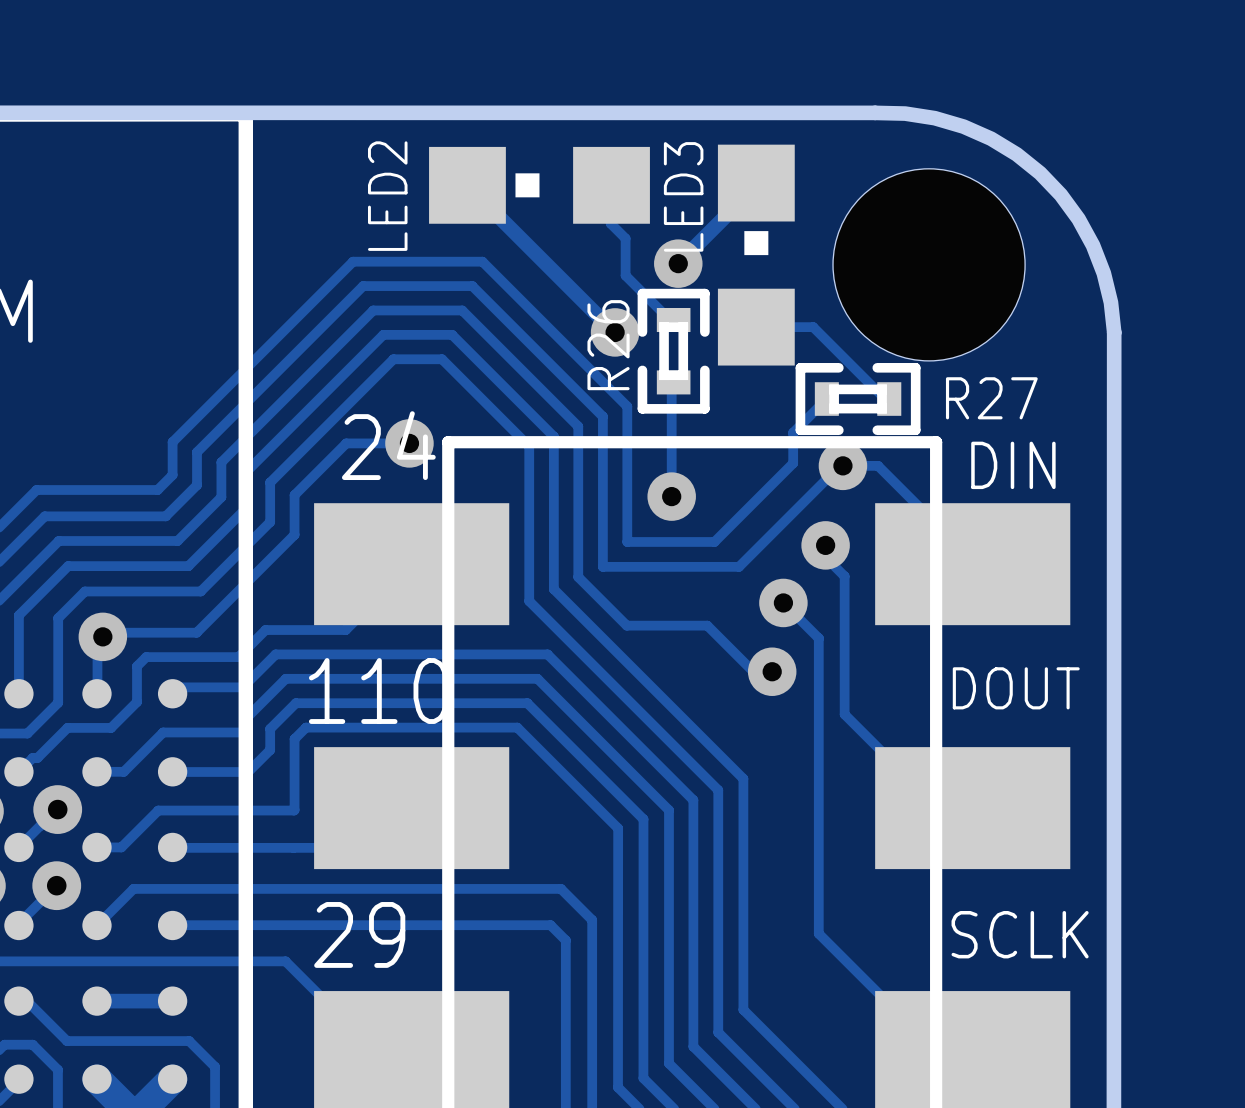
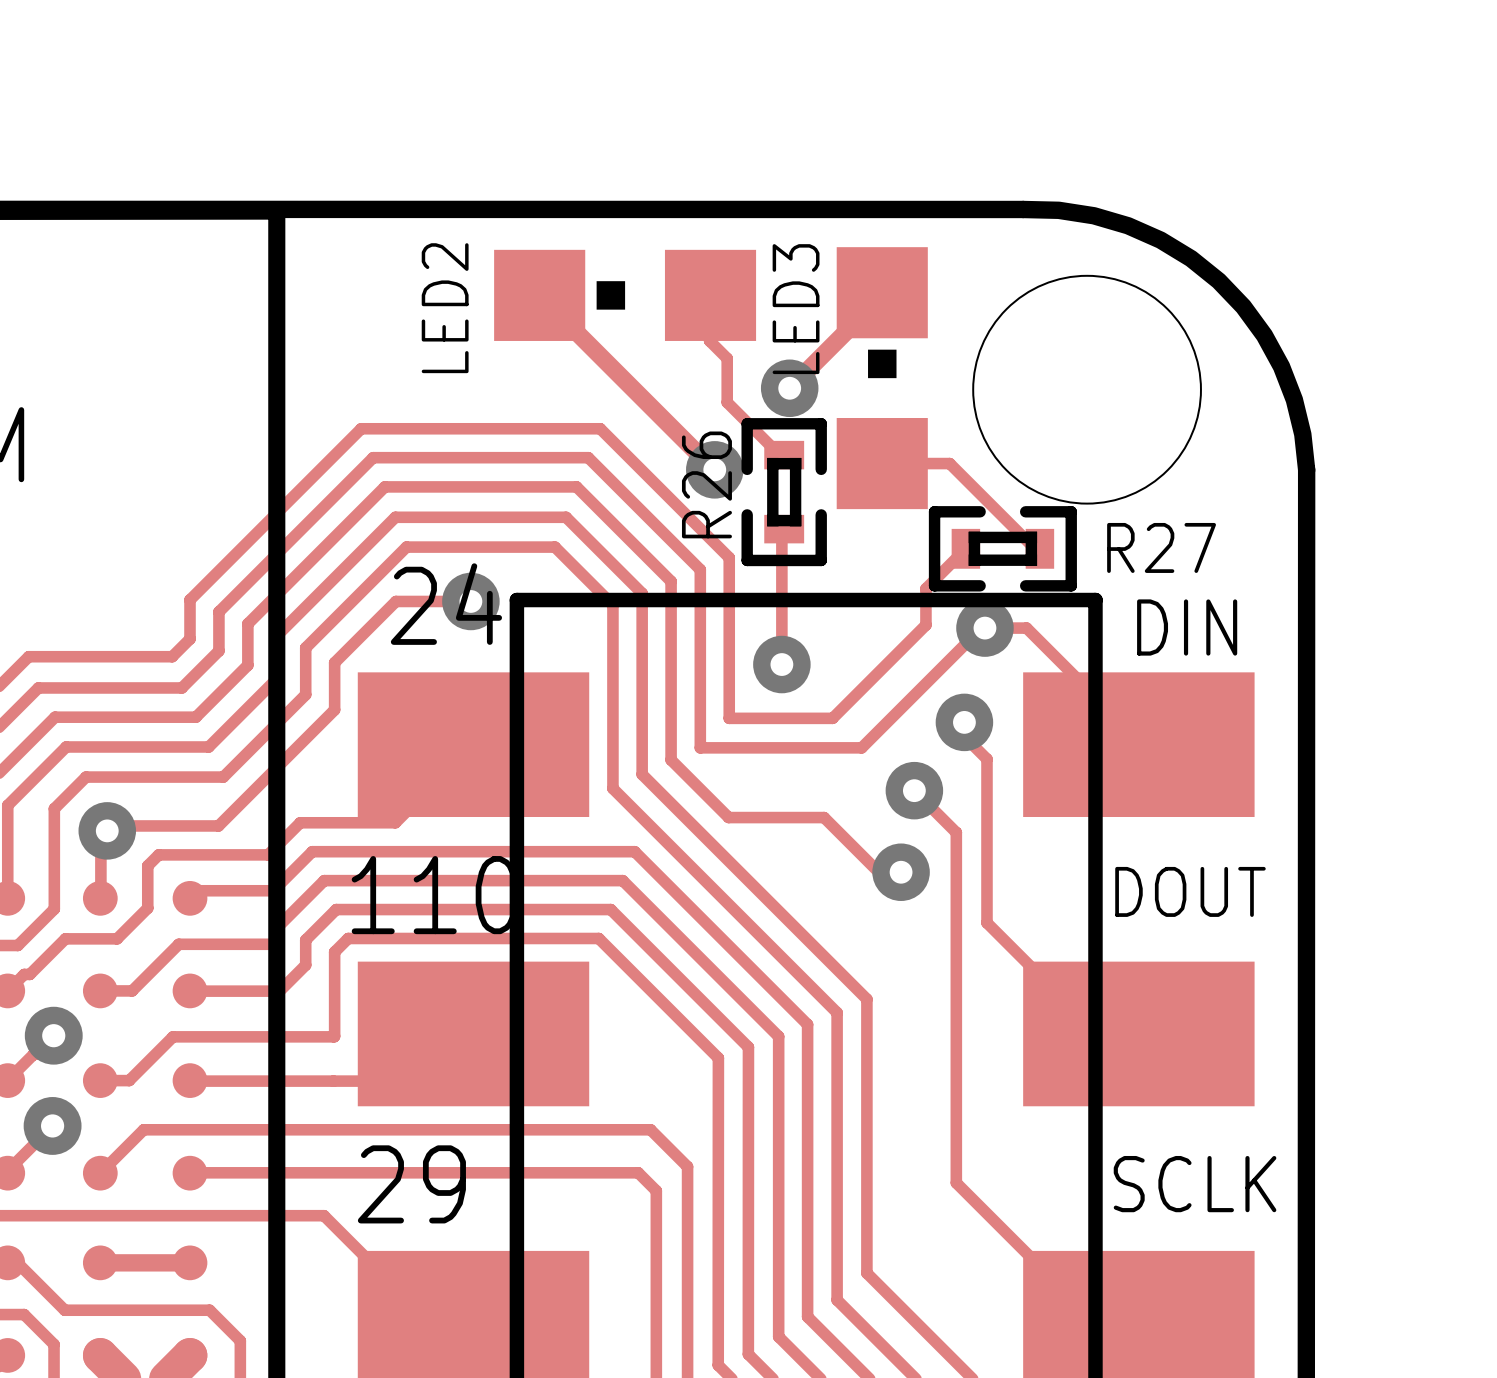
track: (316, 297) (353, 261) (482, 261) (518, 297) -> (361, 428) (600, 428)
track: (327, 322) (363, 286) (472, 286) (508, 322) -> (373, 457) (588, 457)
track: (336, 346) (373, 310) (462, 310) (498, 346) -> (384, 486) (576, 486)
track: (345, 372) (383, 334) (452, 334) (489, 372) -> (395, 517) (566, 517)
track: (355, 397) (393, 359) (442, 359) (480, 397) -> (406, 547) (554, 547)

